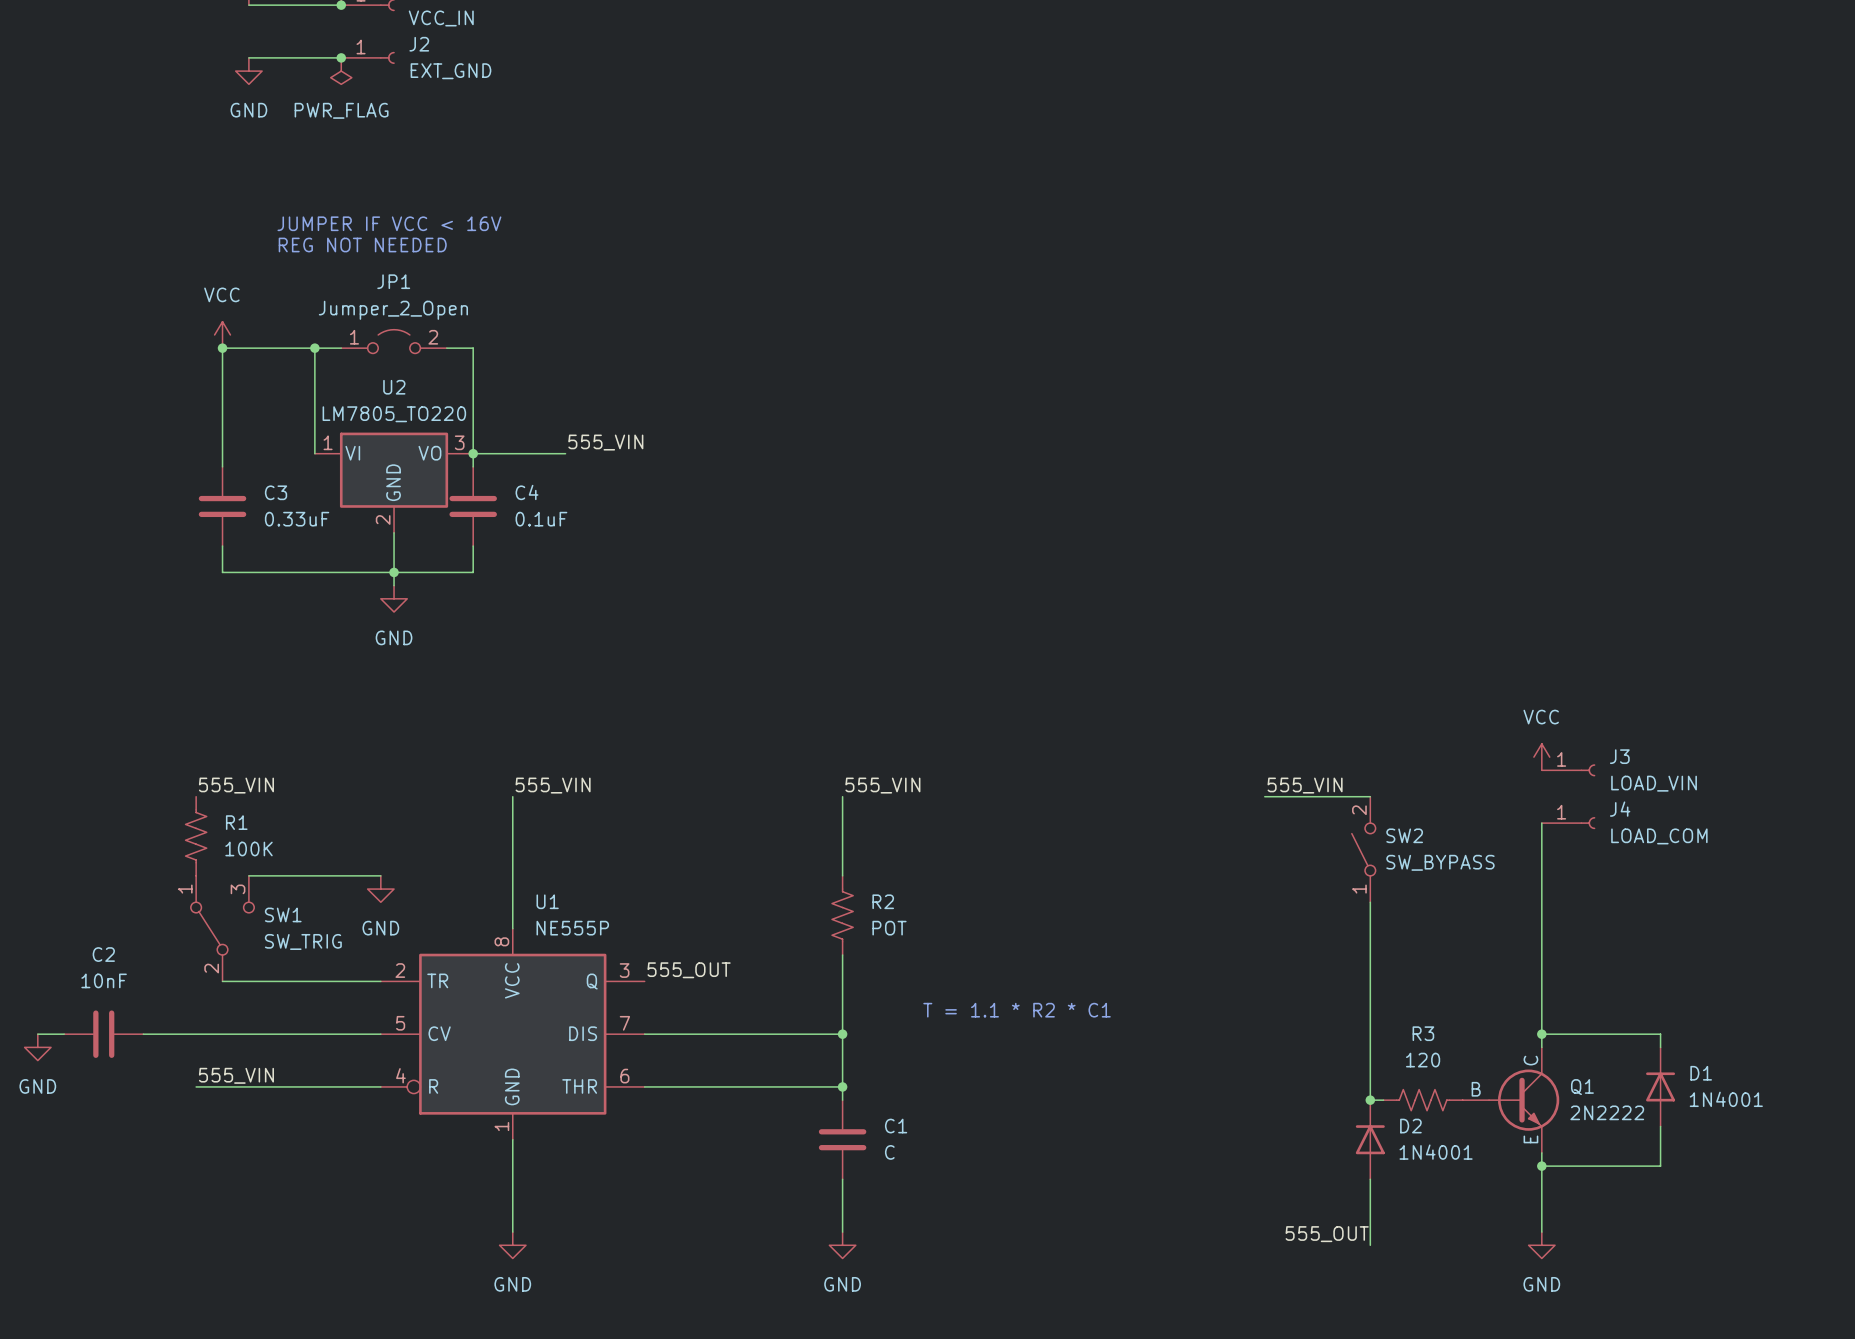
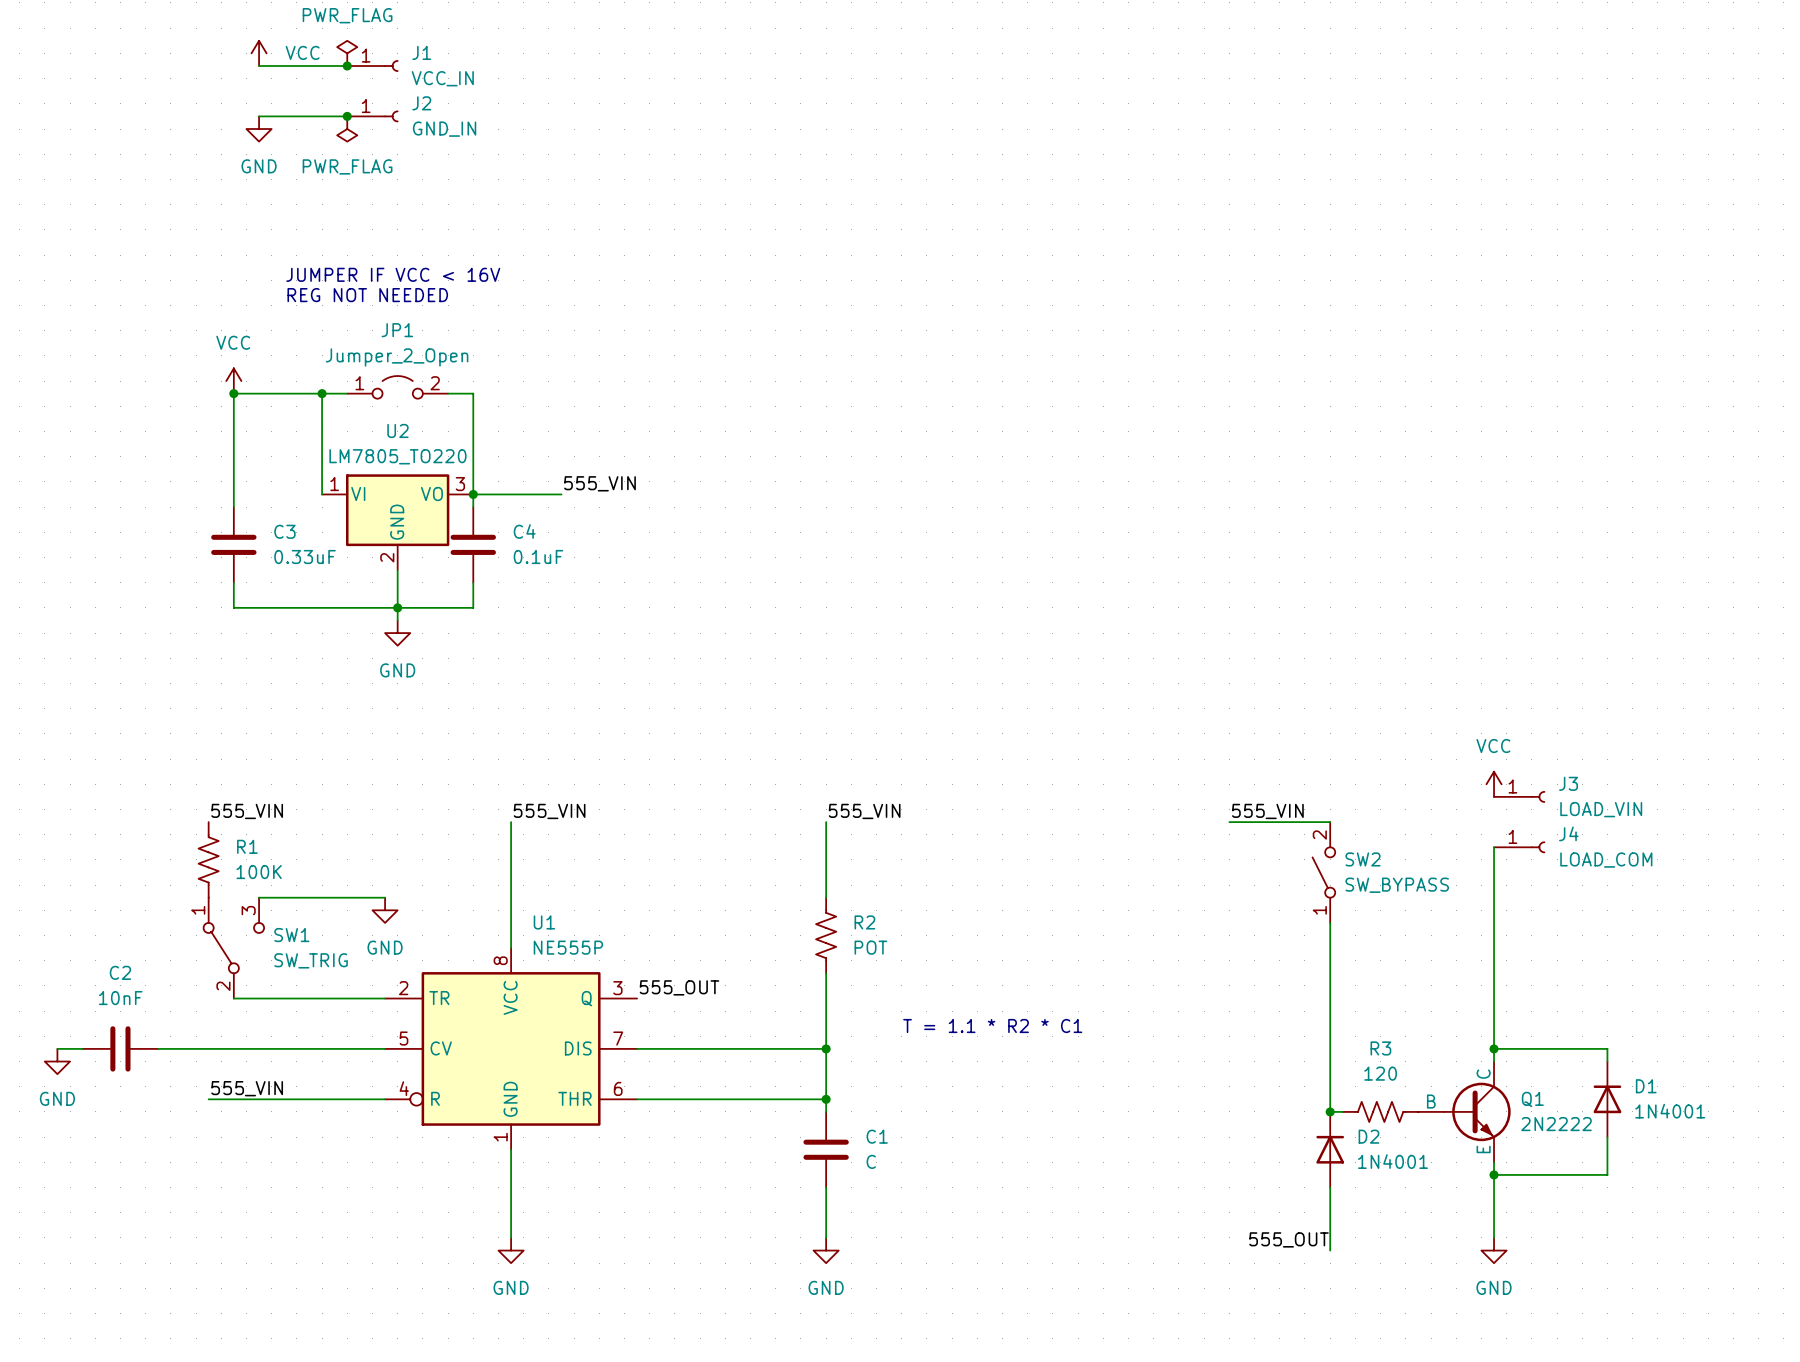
J2 value: EXT_GND (450, 71) -> GND_IN (444, 129)

